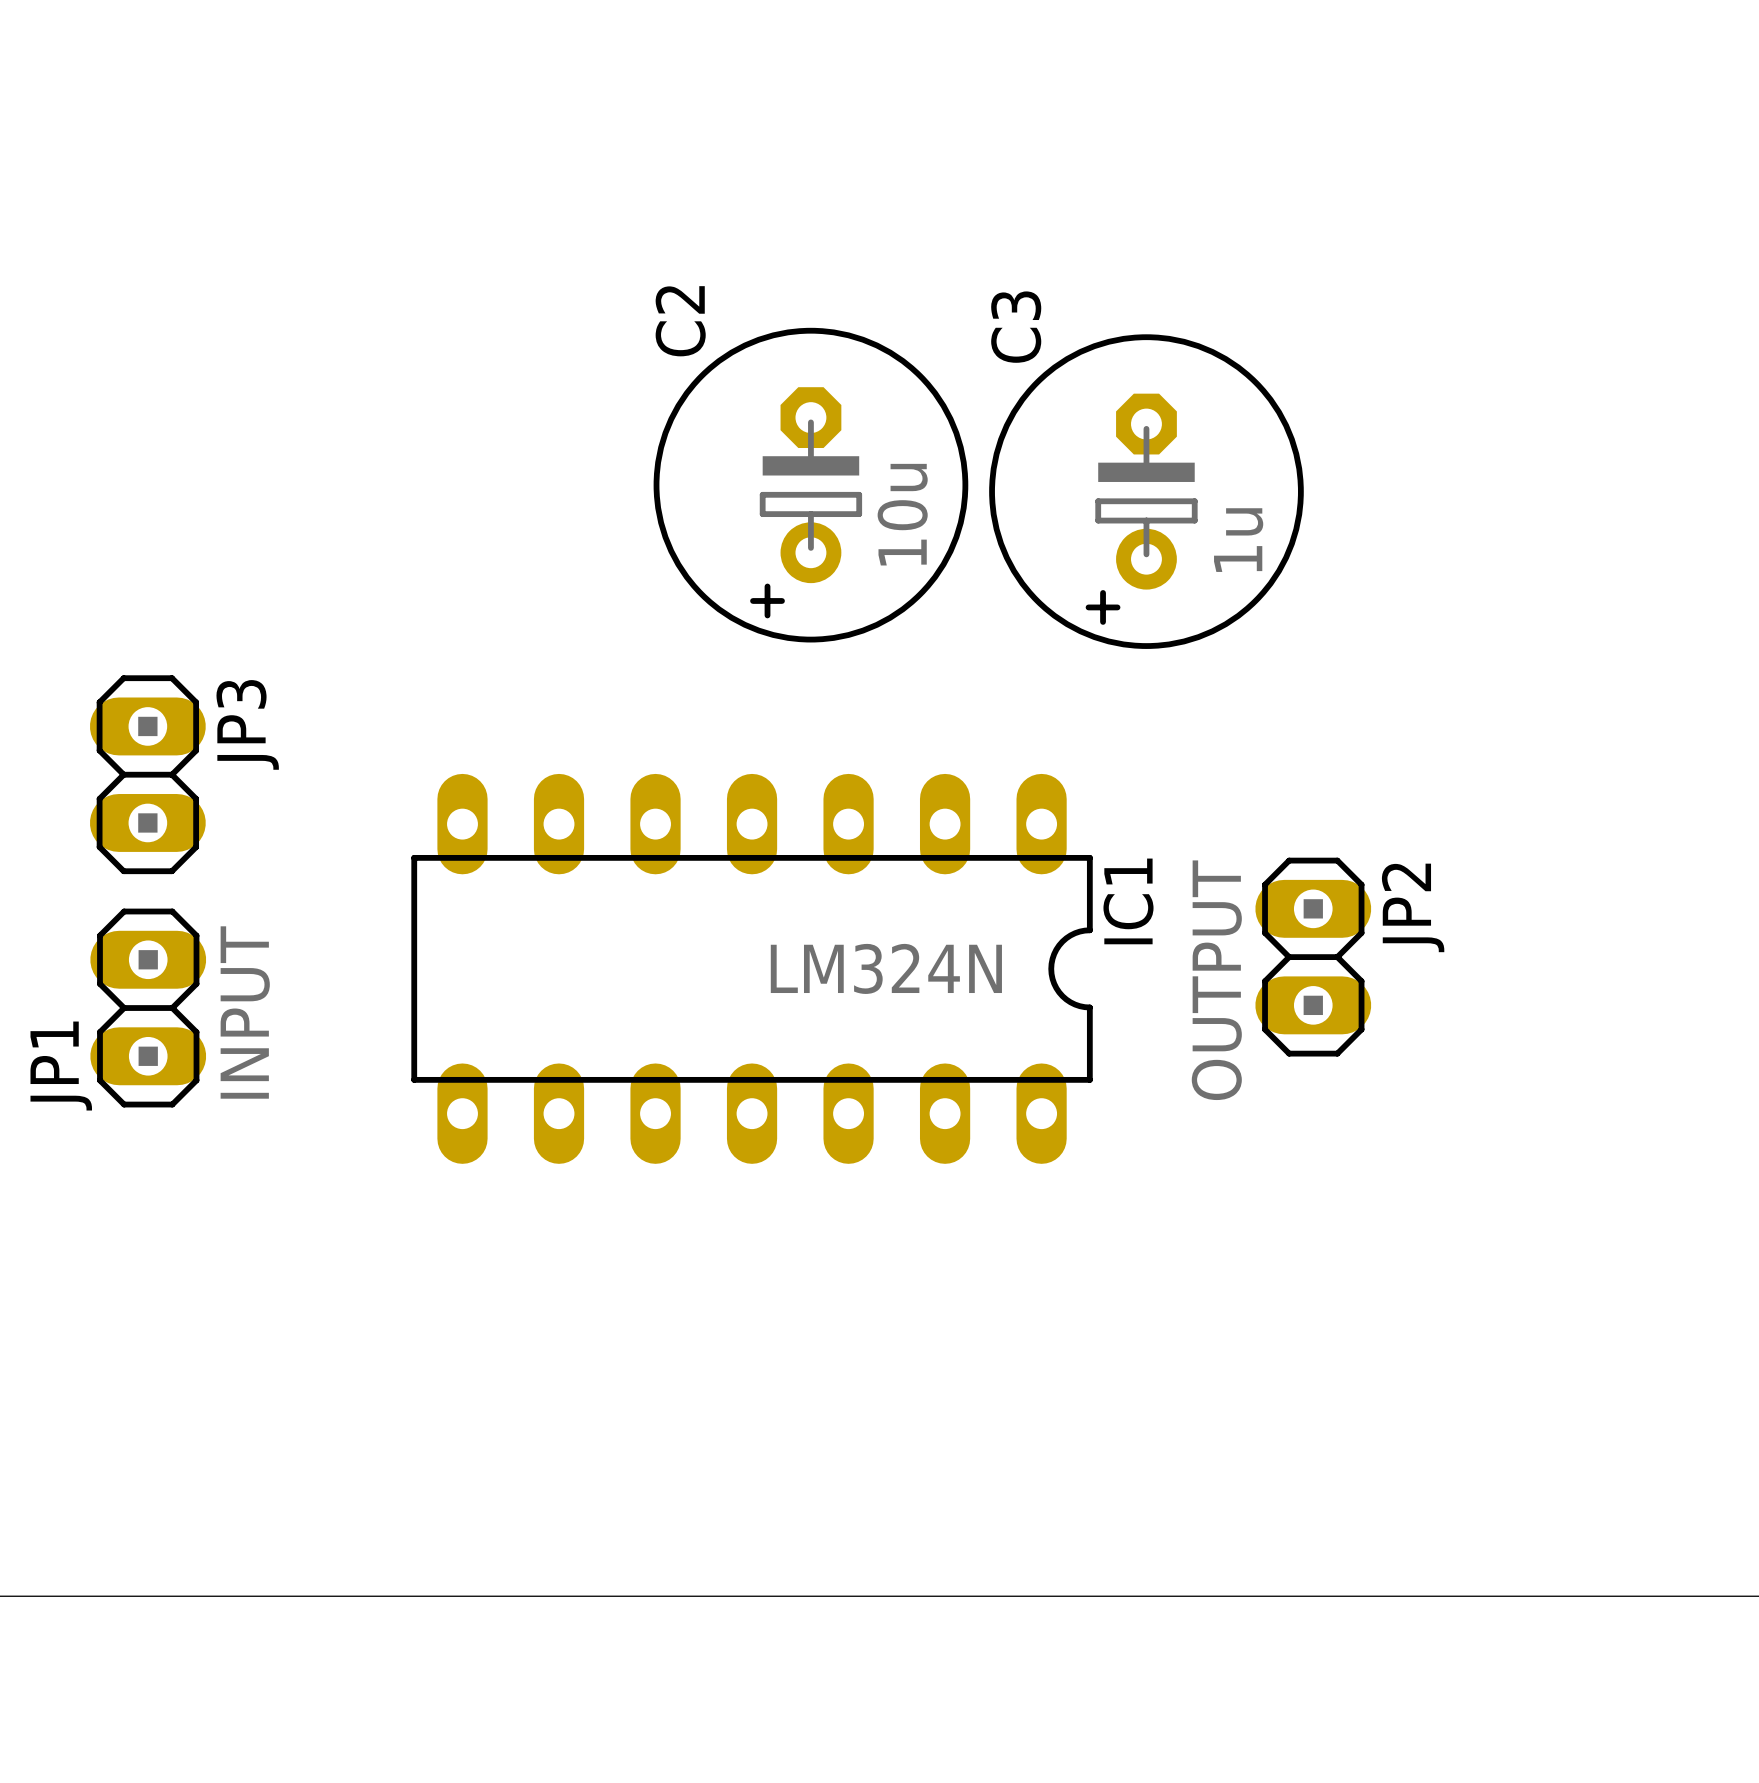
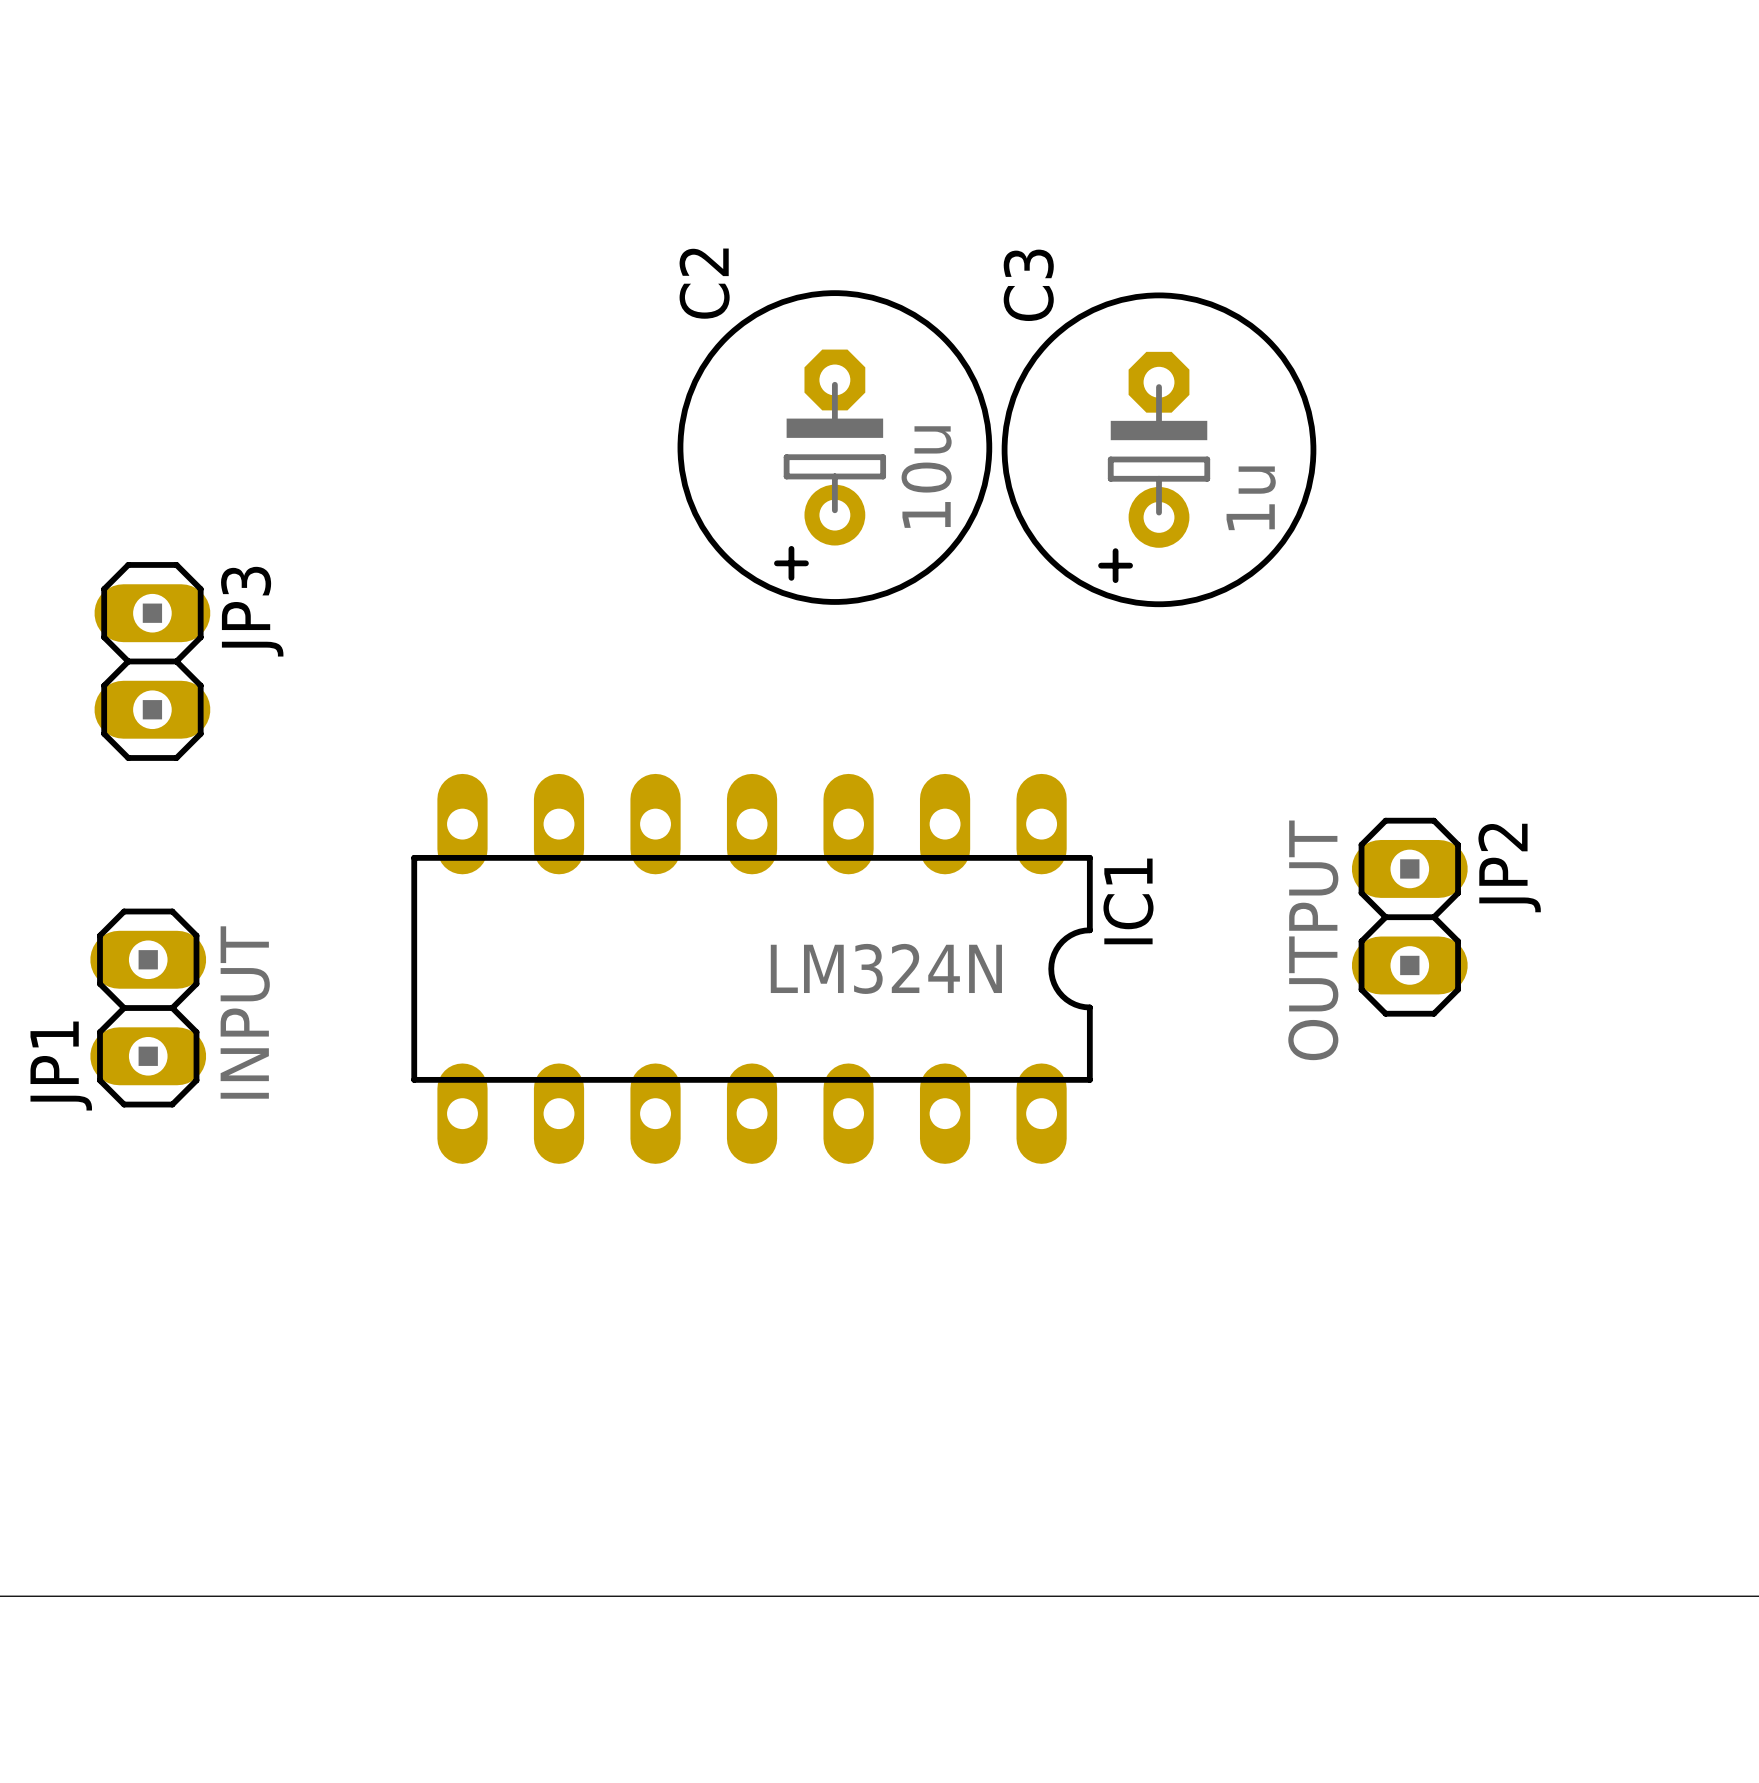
C2 position: (810, 485) -> (834, 447)
C3 position: (1146, 491) -> (1159, 449)
JP3 position: (147, 774) -> (152, 661)
JP2 position: (1313, 957) -> (1409, 917)

